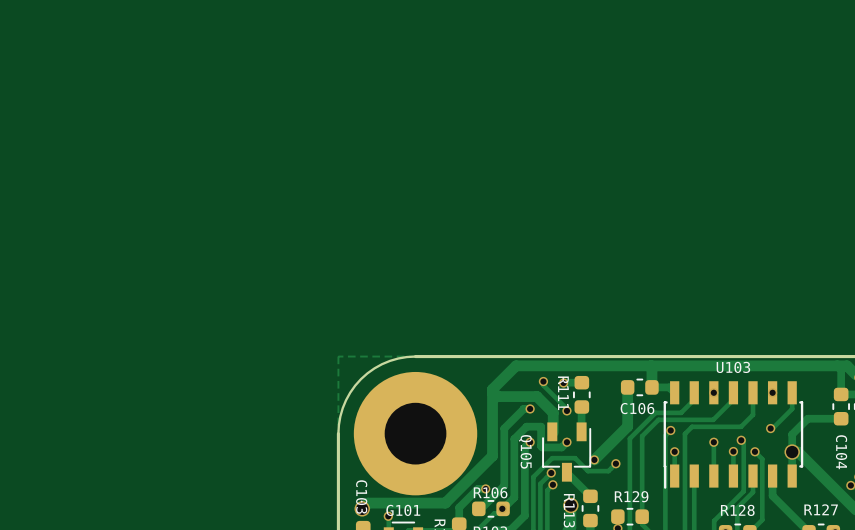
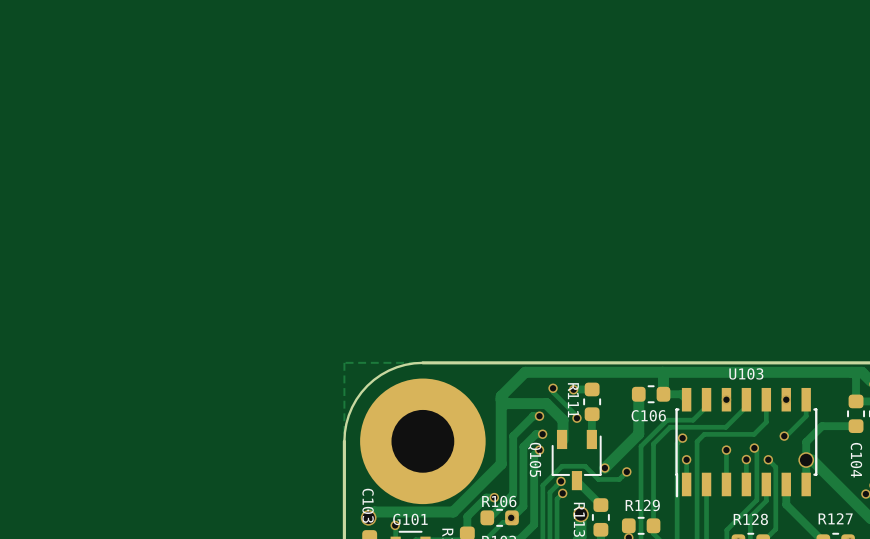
track: (533, 426) (541, 426) (542, 447) (561, 447) (566, 442) -> none
via position: (566, 442) -> (542, 434)

